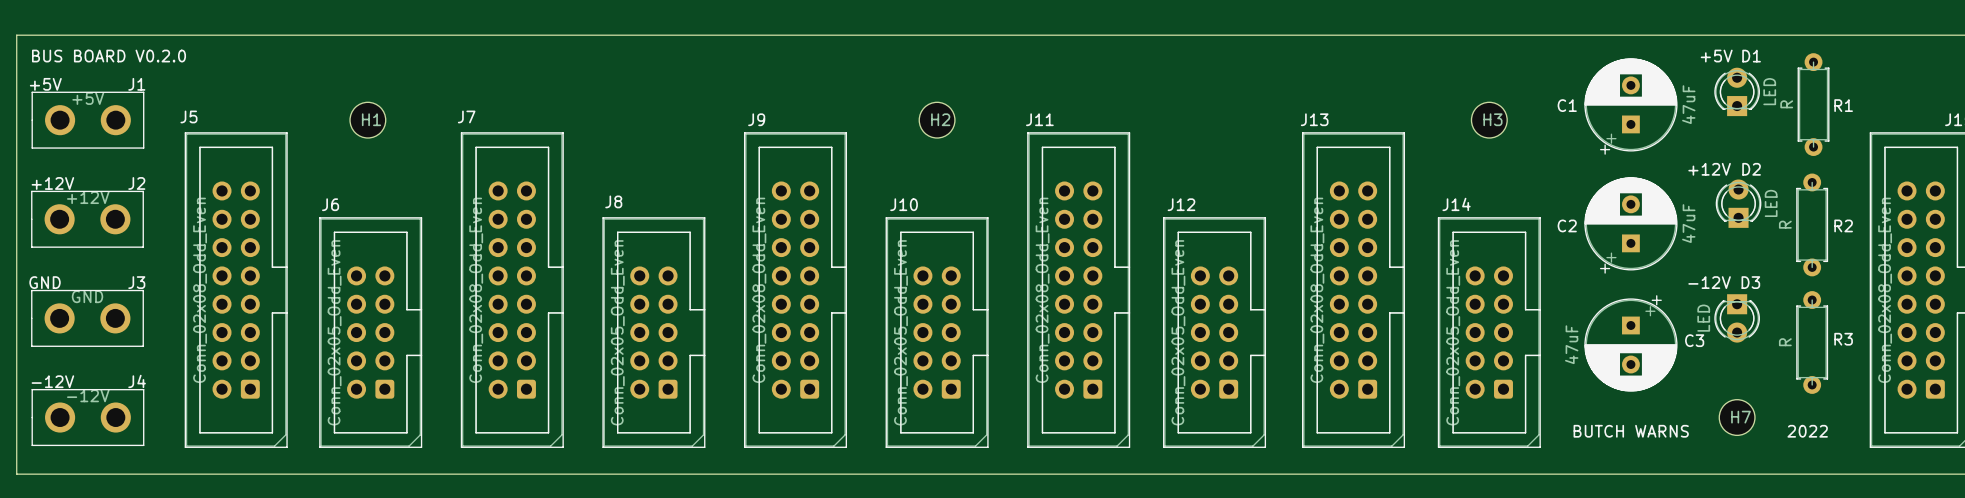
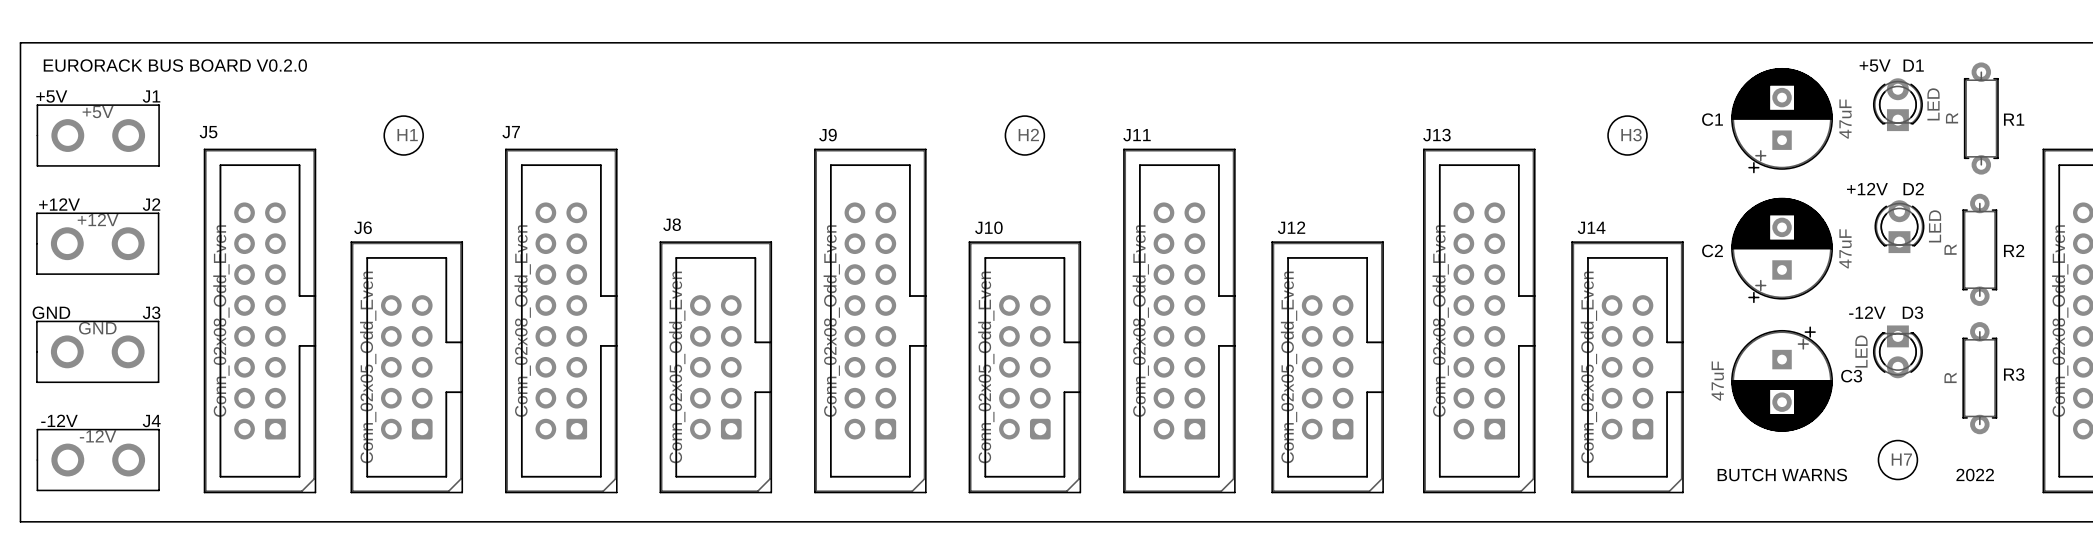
text: BUS BOARD V0.2.0 (109, 56) -> EURORACK BUS BOARD V0.2.0 (175, 65)

